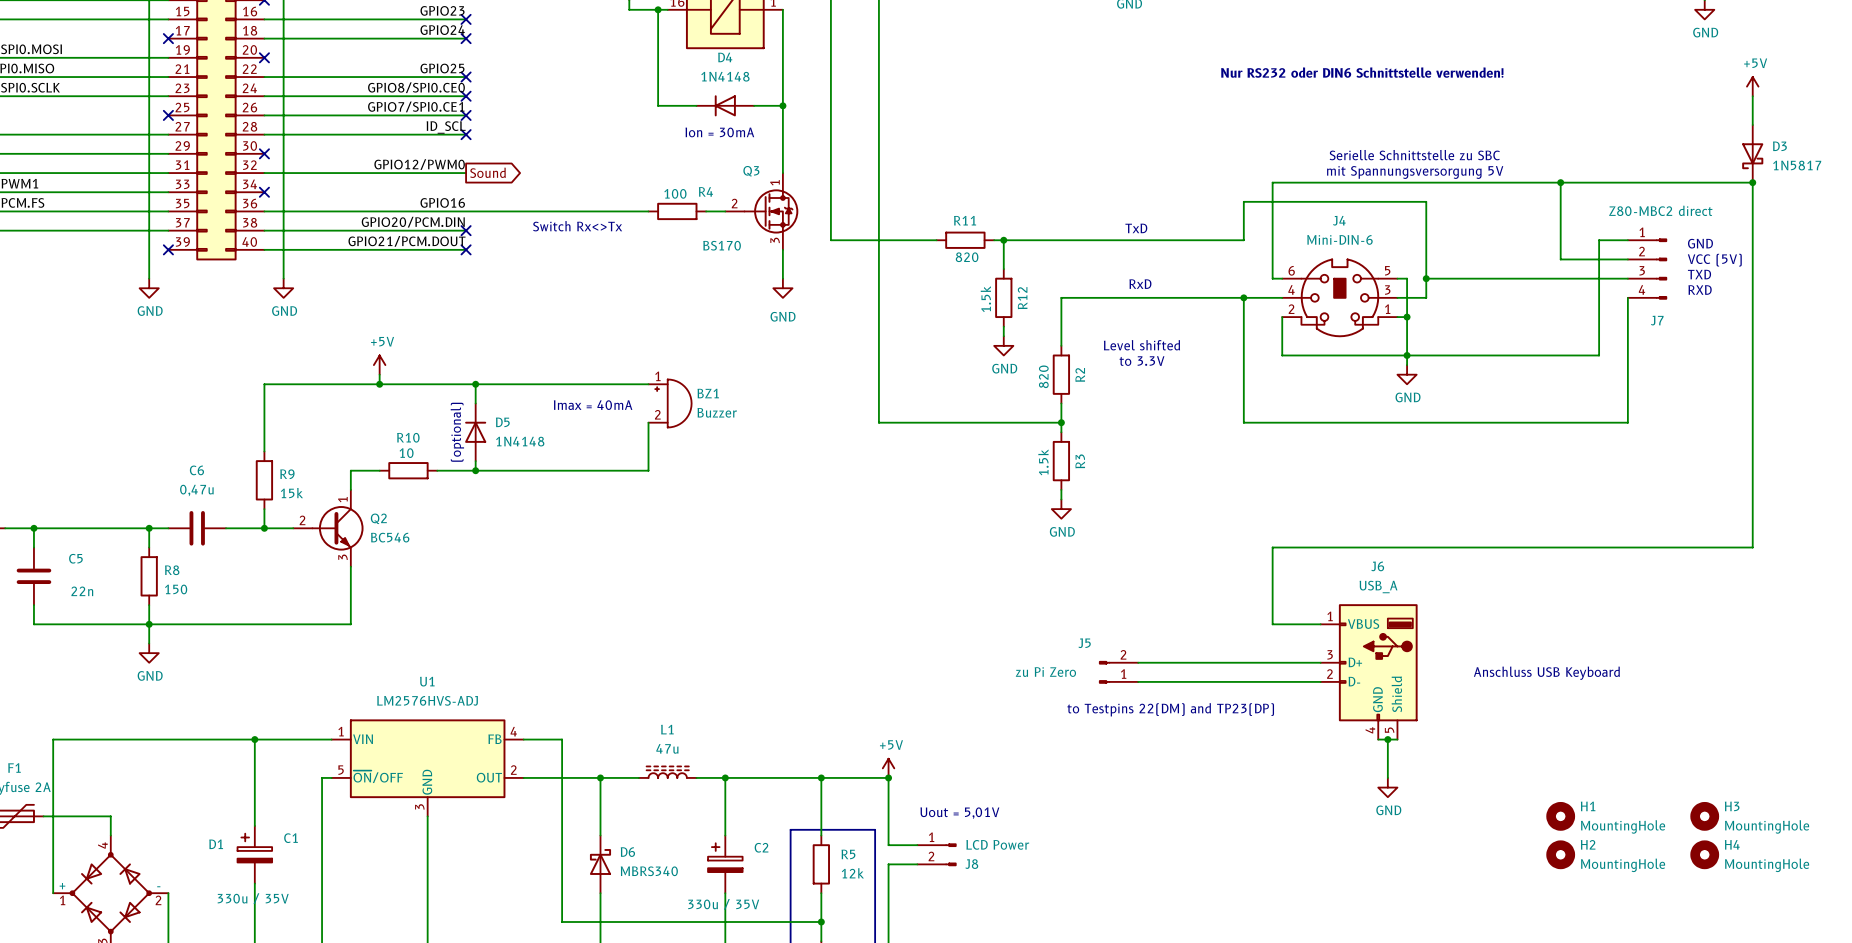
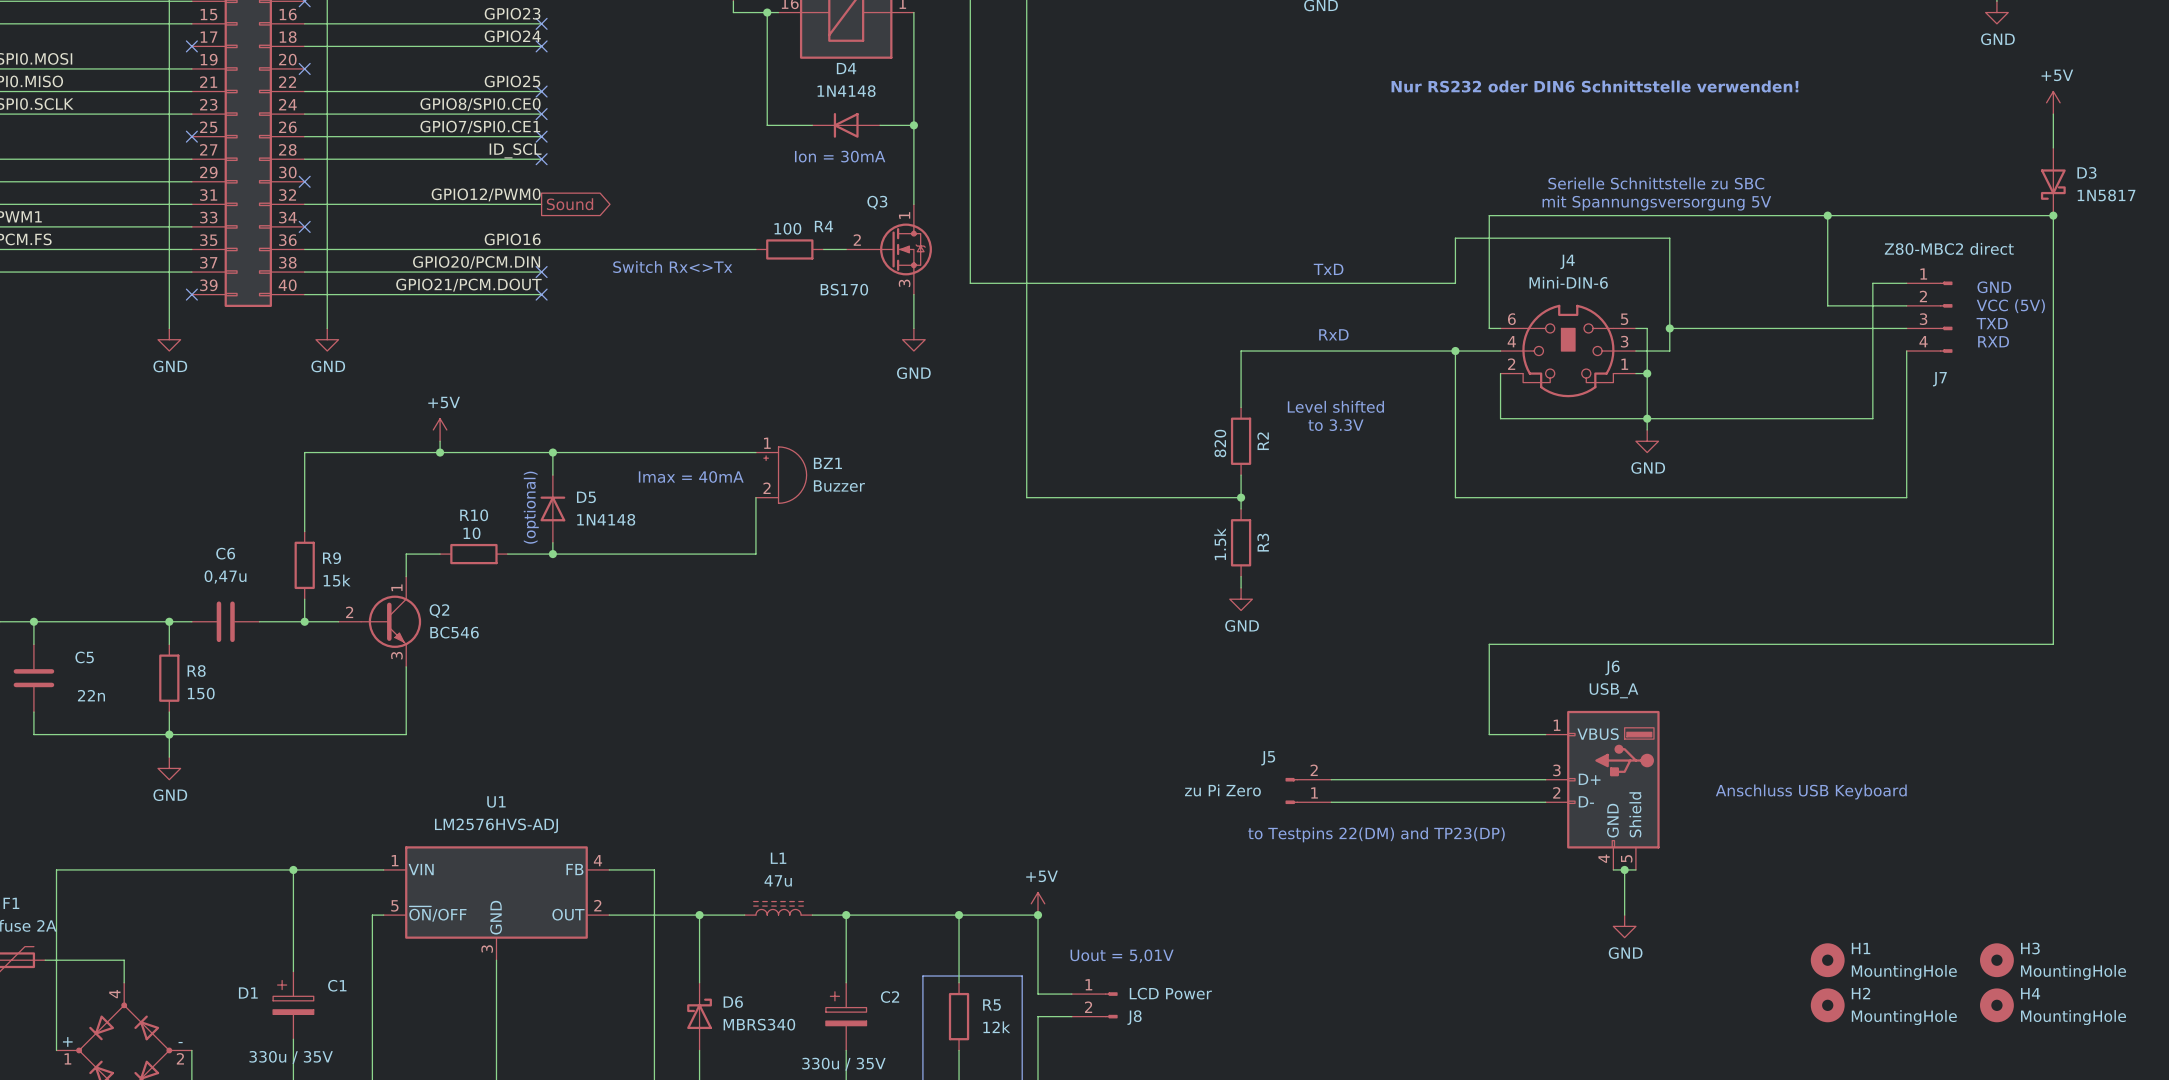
wire: none -> (1094, 283) (1162, 283)
R11: 820 (965, 240) -> none
wire: (1003, 240) (1003, 269) -> none
junction: (1003, 240) -> none
R12: 1.5k (1003, 297) -> none
wire: (1003, 326) (1003, 336) -> none
power symbol: GND (1003, 345) -> none

